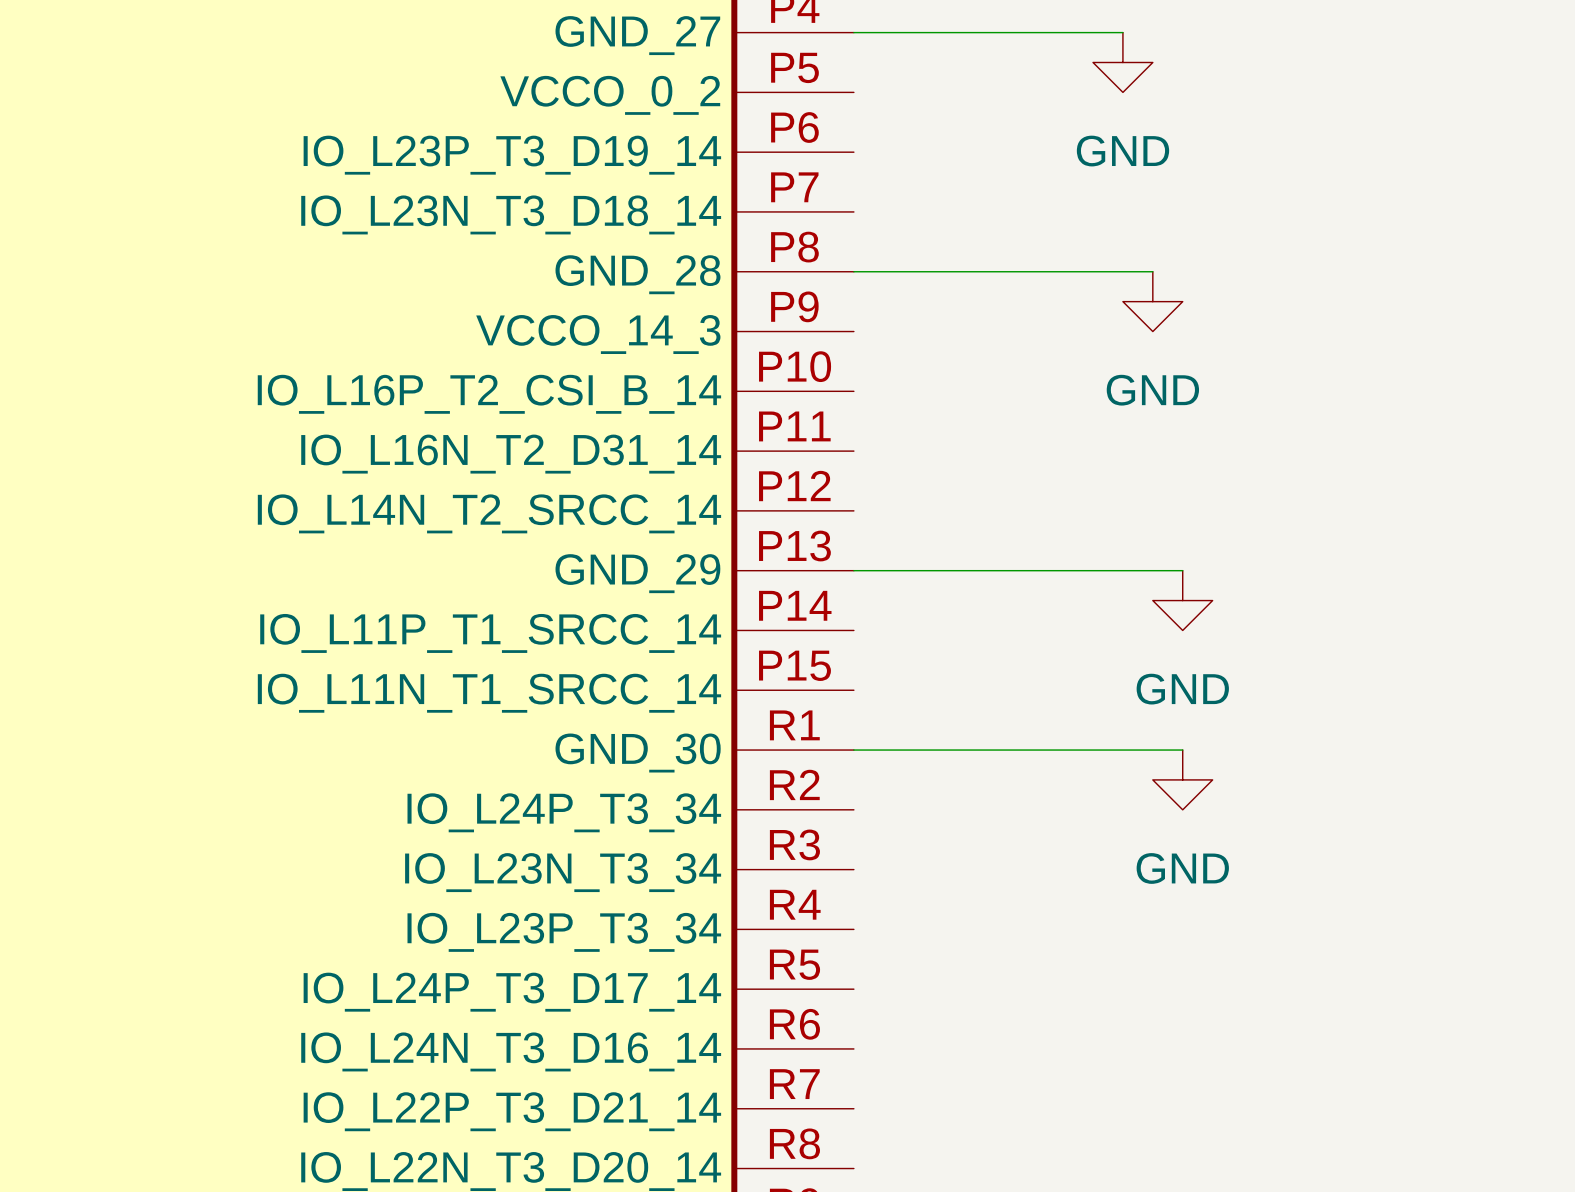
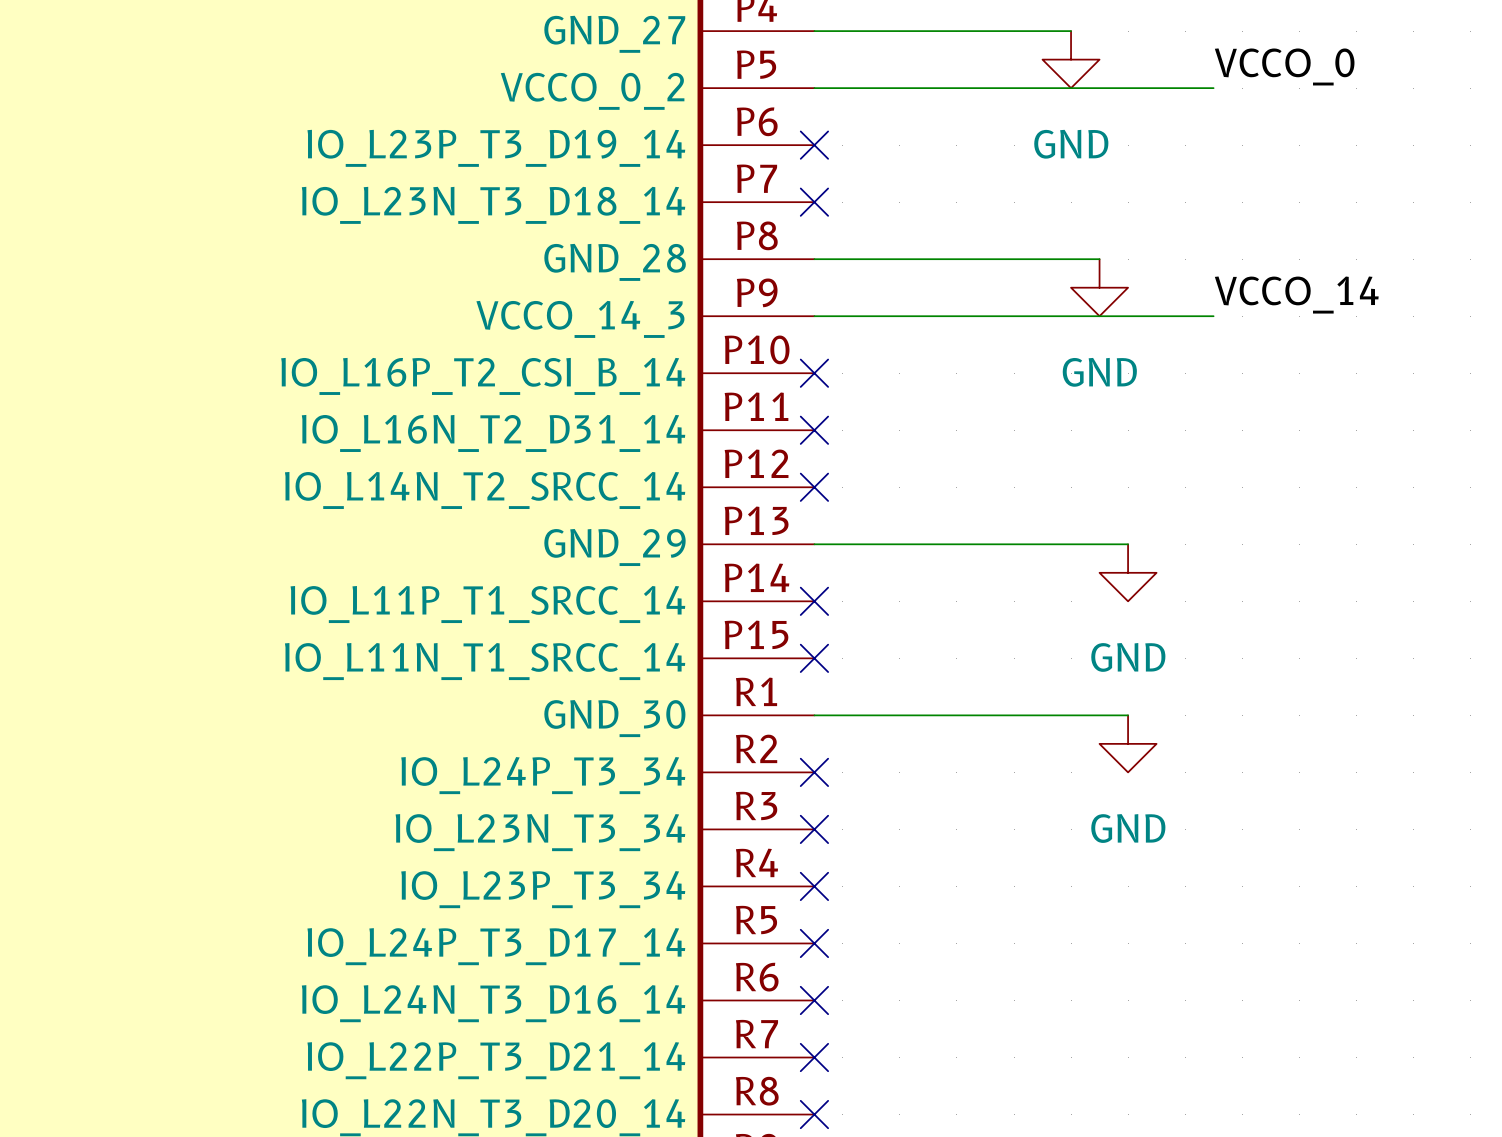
label: none -> VCCO_0 (1284, 66)
wire: none -> (814, 88) (1213, 88)
no-connect mark: none -> (814, 145)
no-connect mark: none -> (814, 202)
label: none -> VCCO_14 (1296, 295)
wire: none -> (814, 316) (1213, 316)
no-connect mark: none -> (814, 373)
no-connect mark: none -> (814, 430)
no-connect mark: none -> (814, 487)
no-connect mark: none -> (814, 601)
no-connect mark: none -> (814, 658)
no-connect mark: none -> (814, 772)
no-connect mark: none -> (814, 829)
no-connect mark: none -> (814, 886)
no-connect mark: none -> (814, 943)
no-connect mark: none -> (814, 1000)
no-connect mark: none -> (814, 1057)
no-connect mark: none -> (814, 1114)

